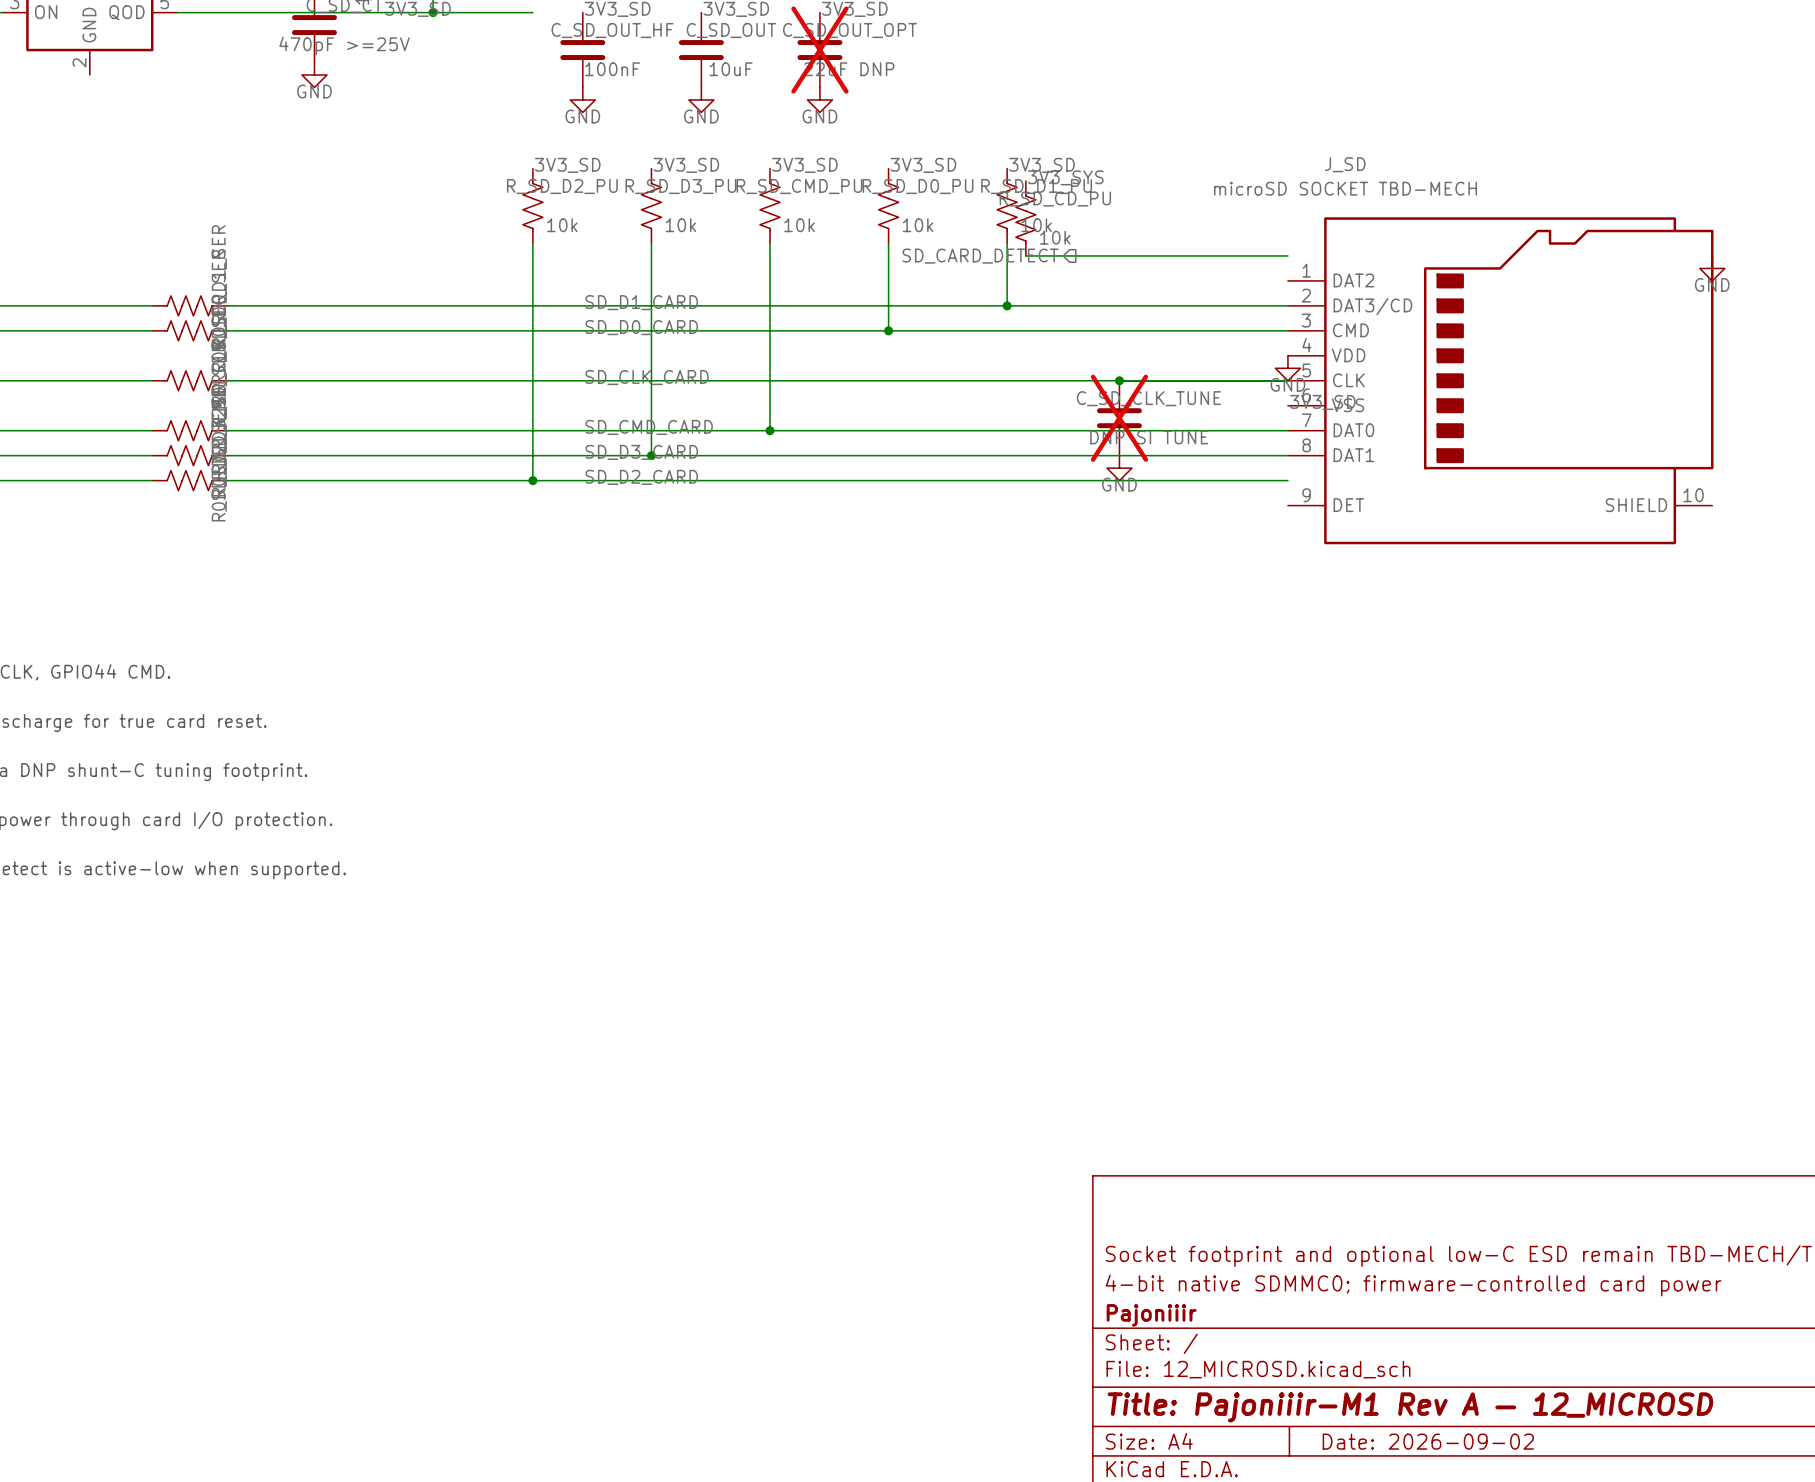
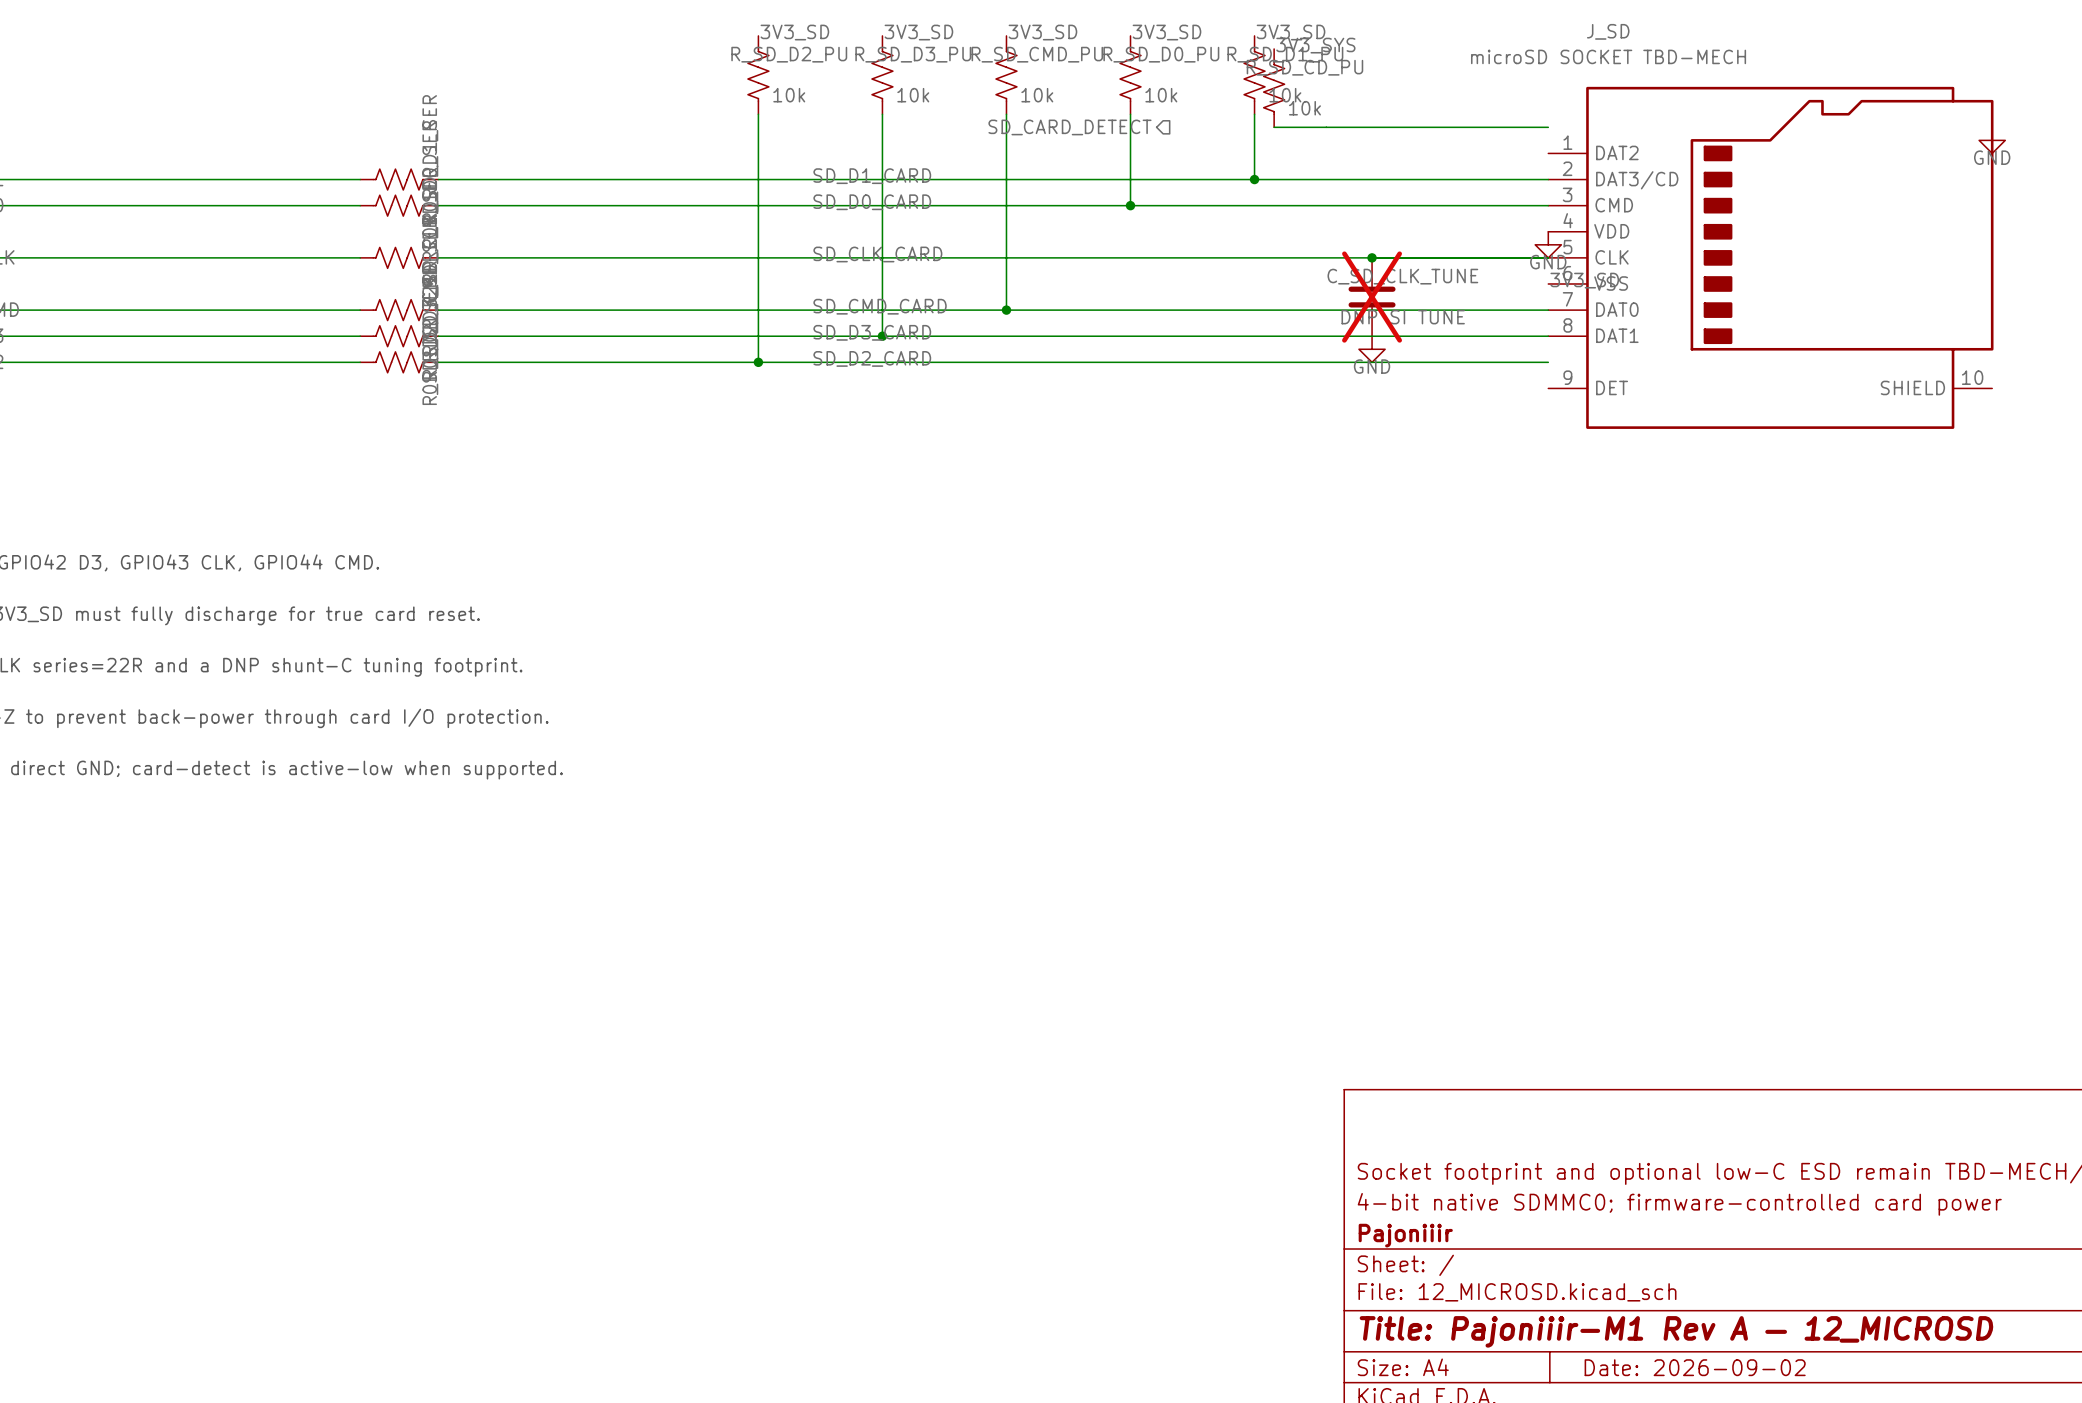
hierarchical label position: SD_CARD_DETECT (980, 256) -> SD_CARD_DETECT (1069, 127)

